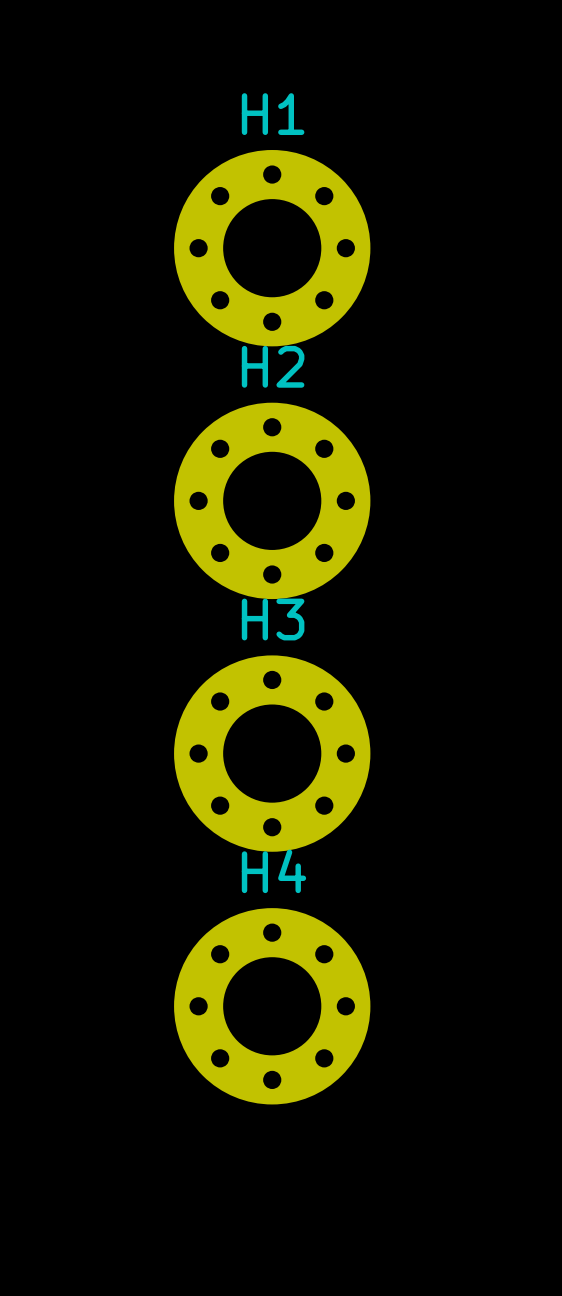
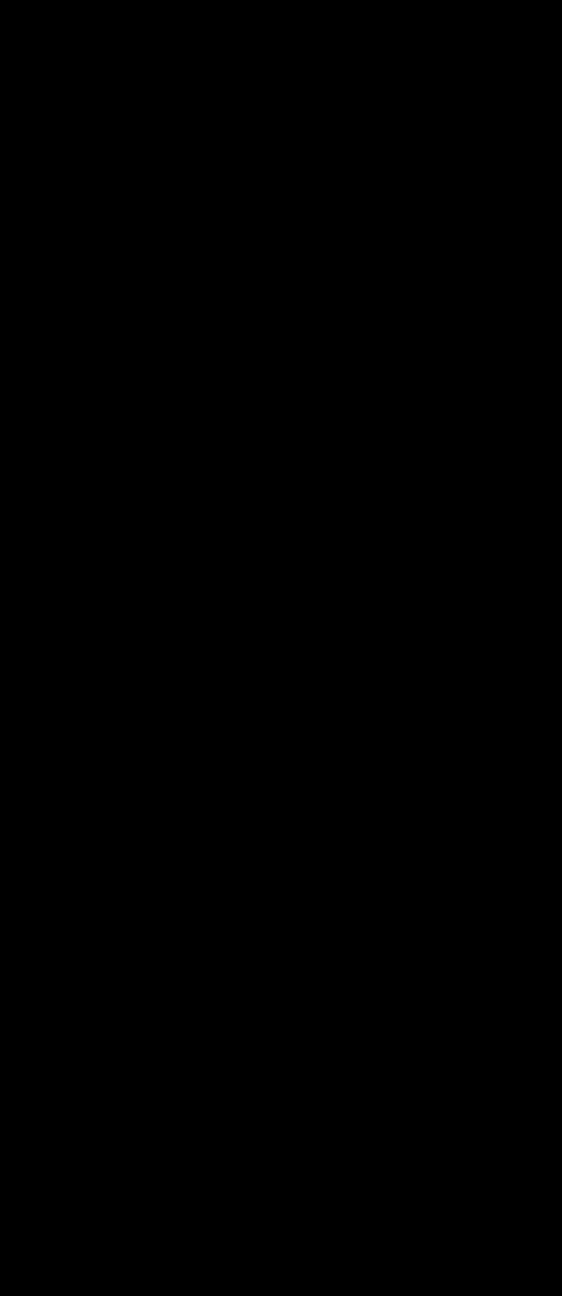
H1: (272, 248) -> none
H2: (272, 500) -> none
H3: (272, 753) -> none
H4: (272, 1006) -> none

